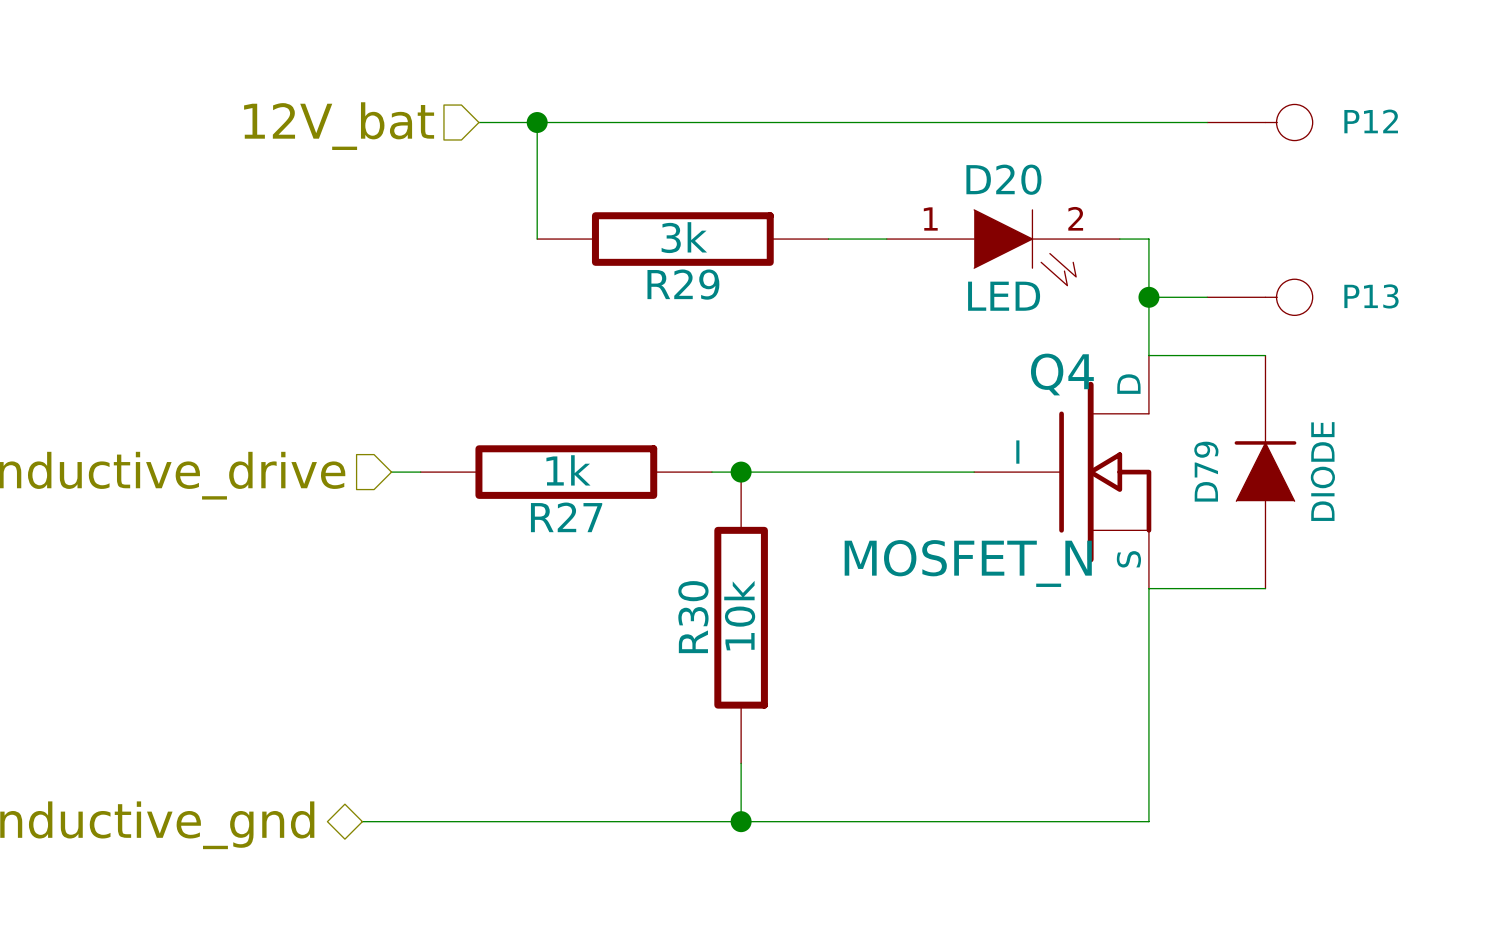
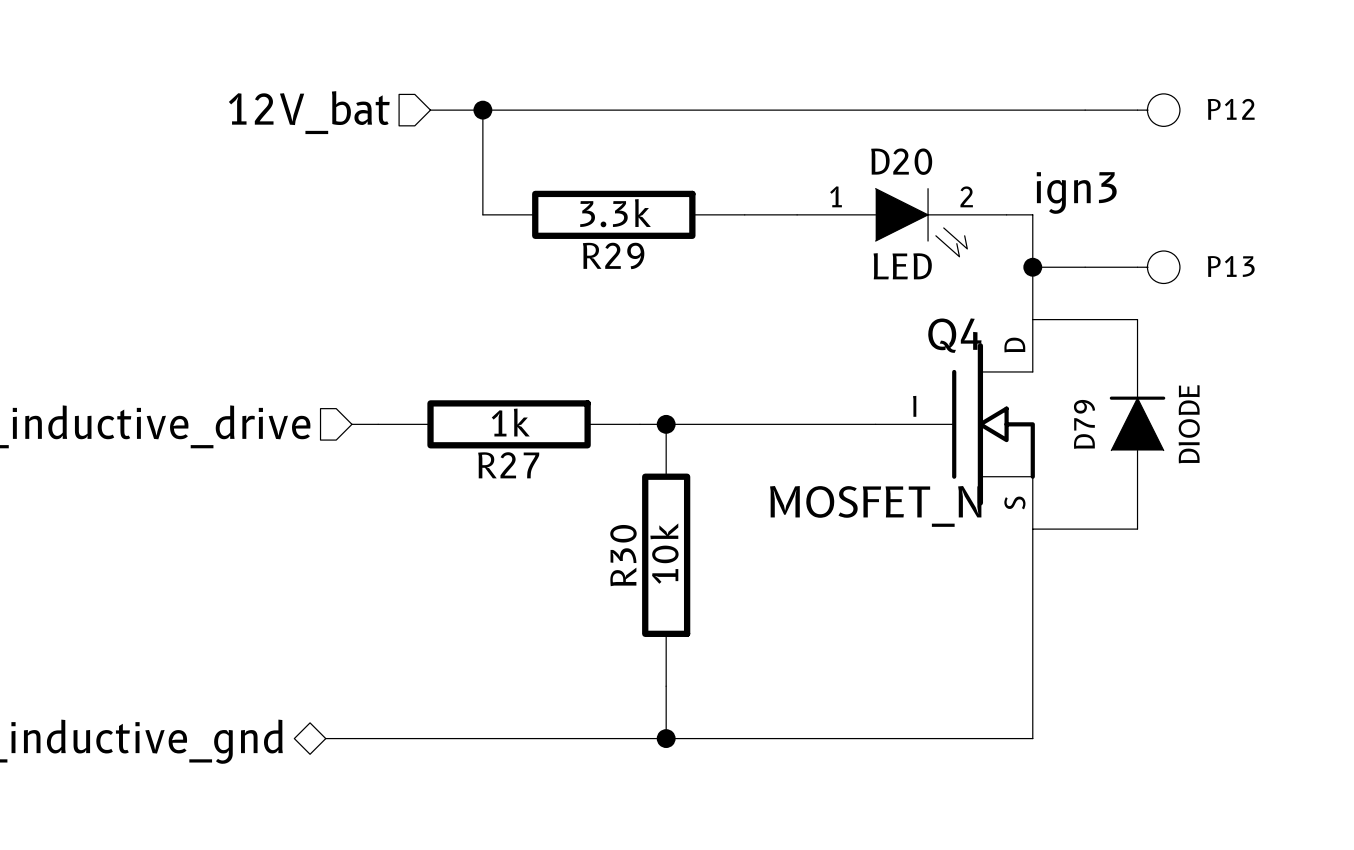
label: none -> ign3 (1076, 193)
R29 value: 3k (684, 237) -> 3.3k (615, 213)

